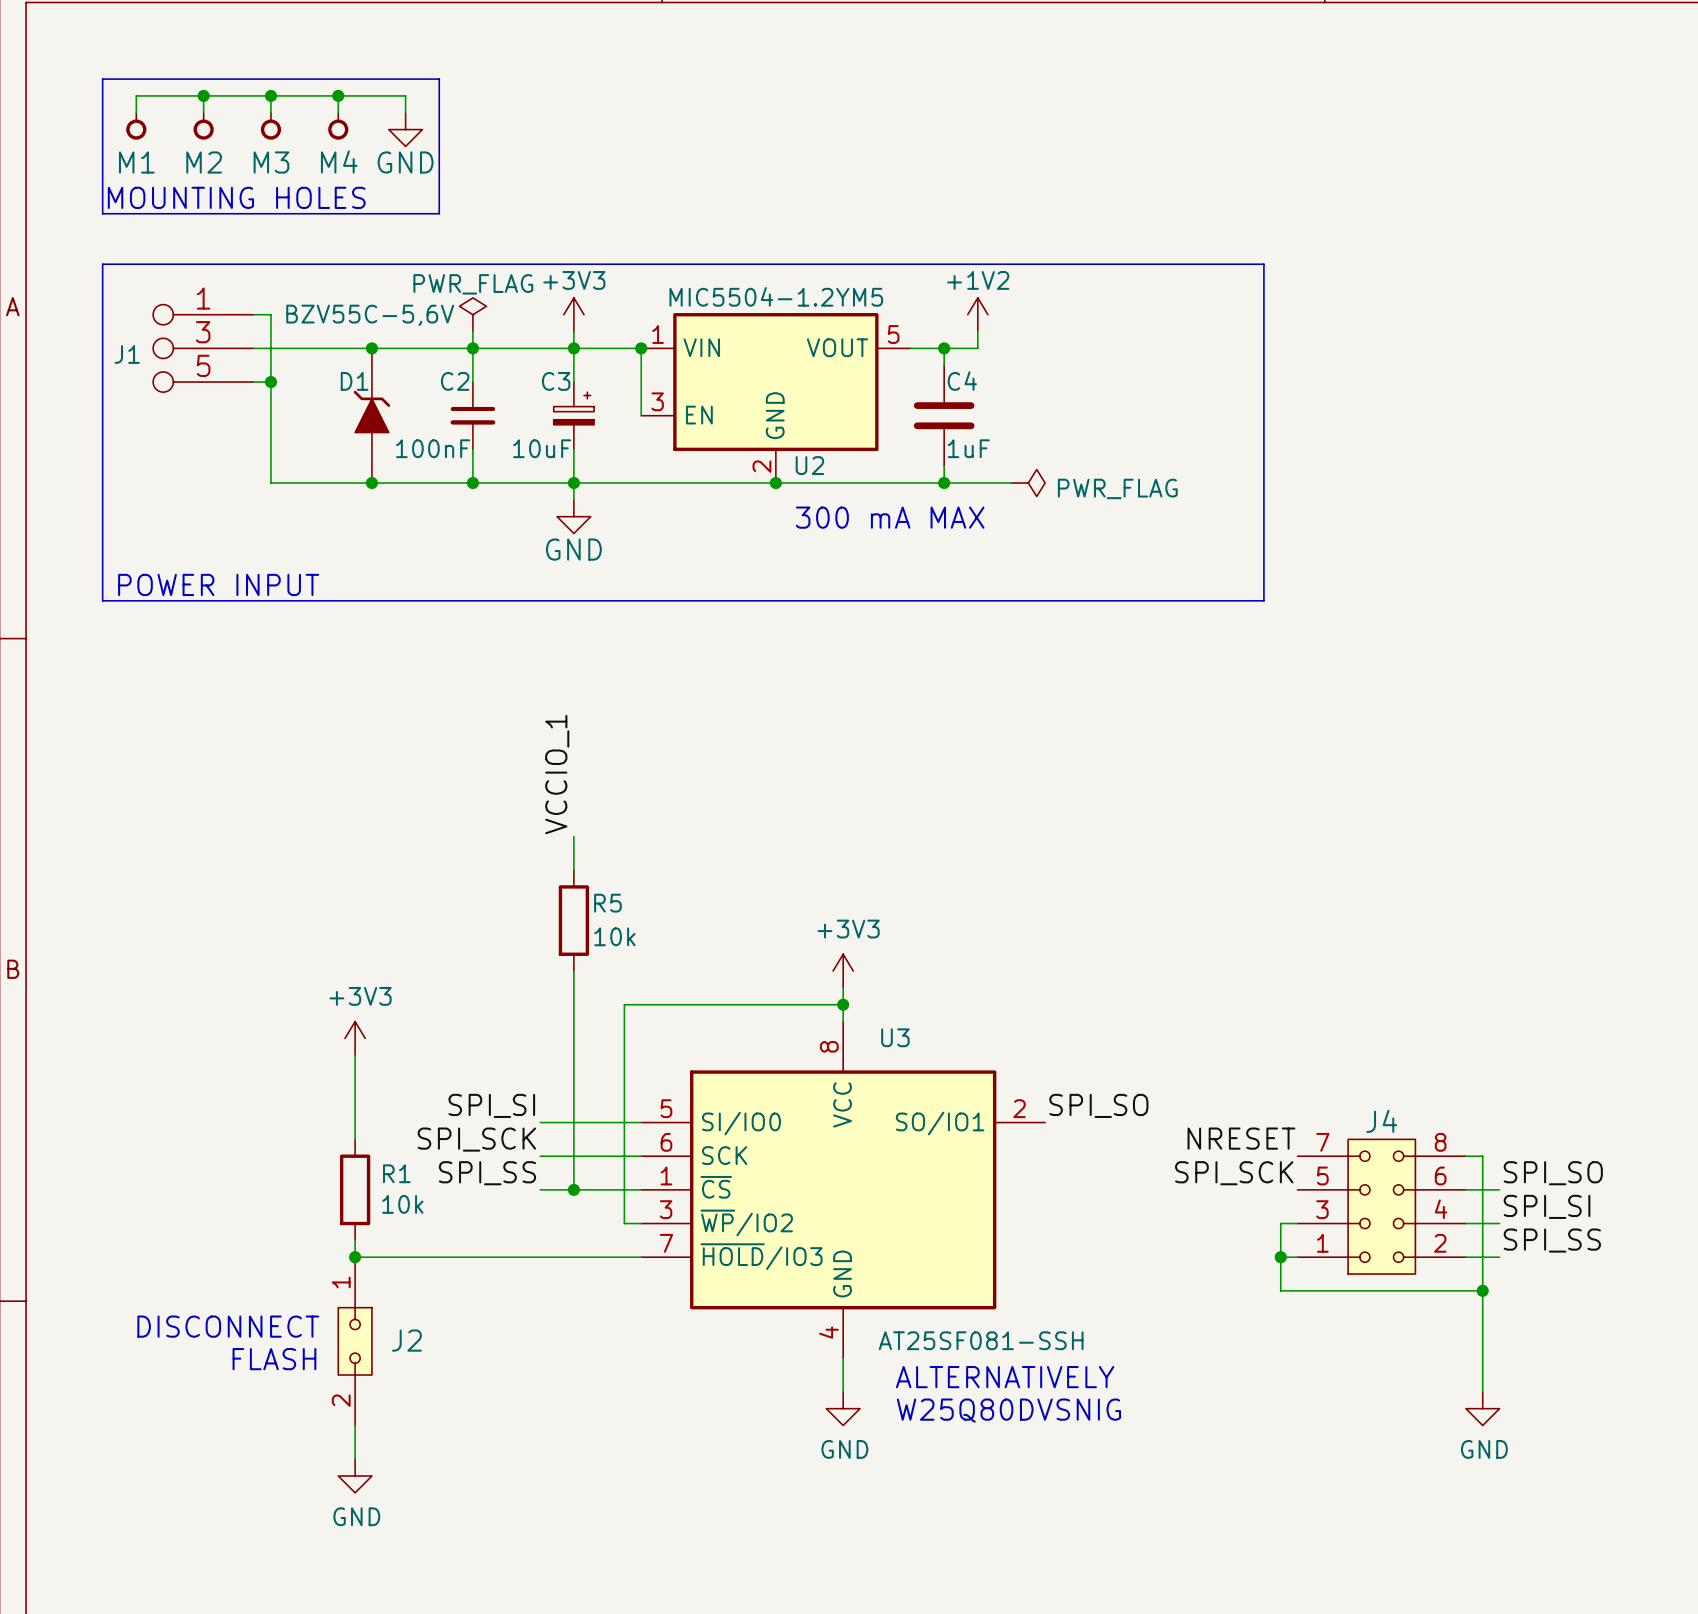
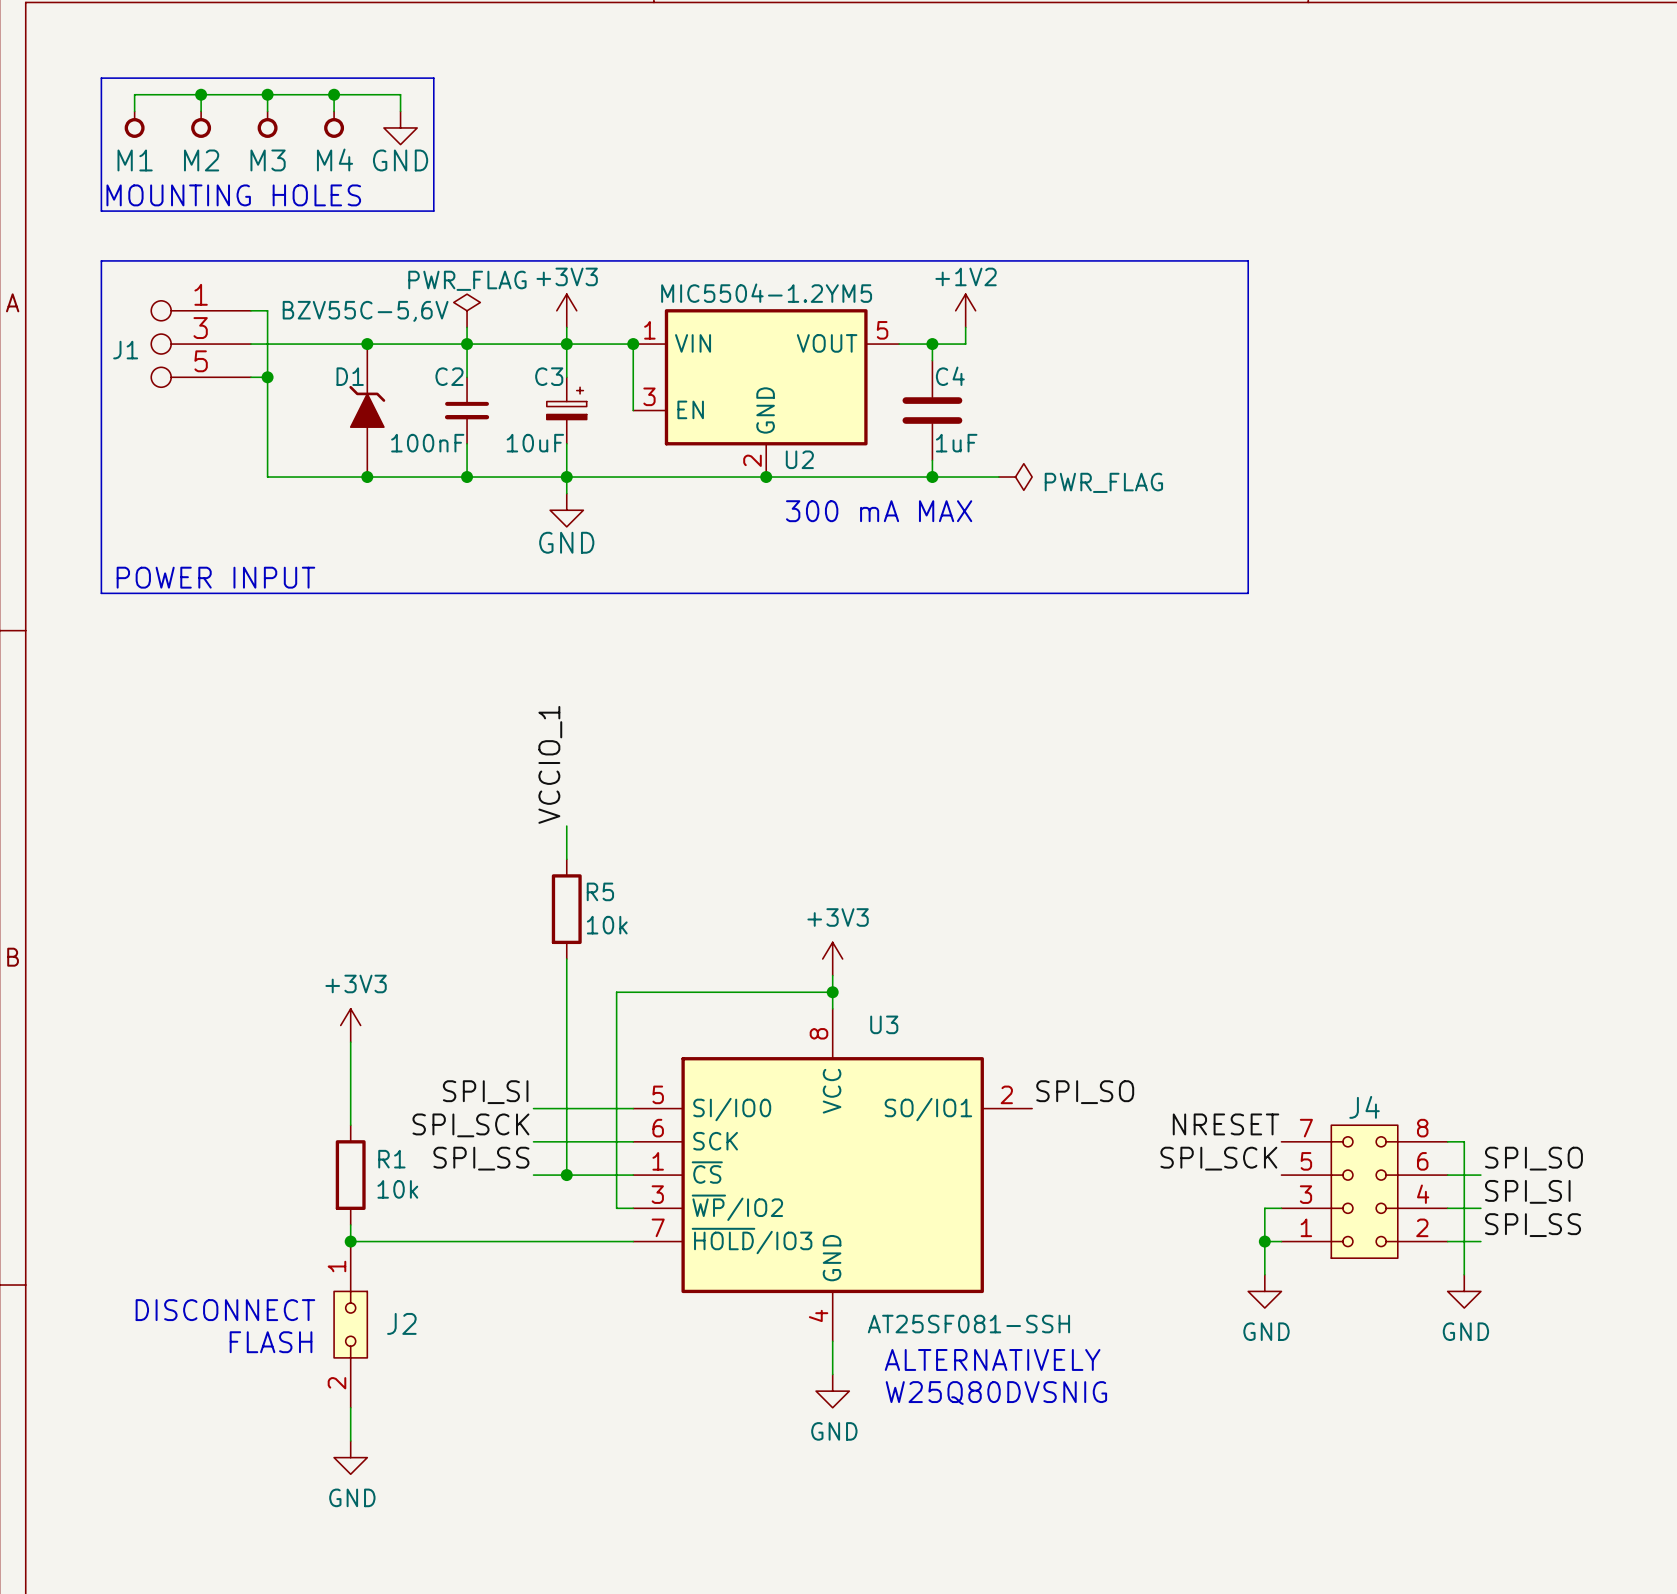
wire: (1280, 1290) (1482, 1290) (1482, 1391) -> none
junction: (1482, 1290) -> none
power symbol: none -> GND (1264, 1291)
power symbol position: GND (1482, 1408) -> GND (1464, 1291)

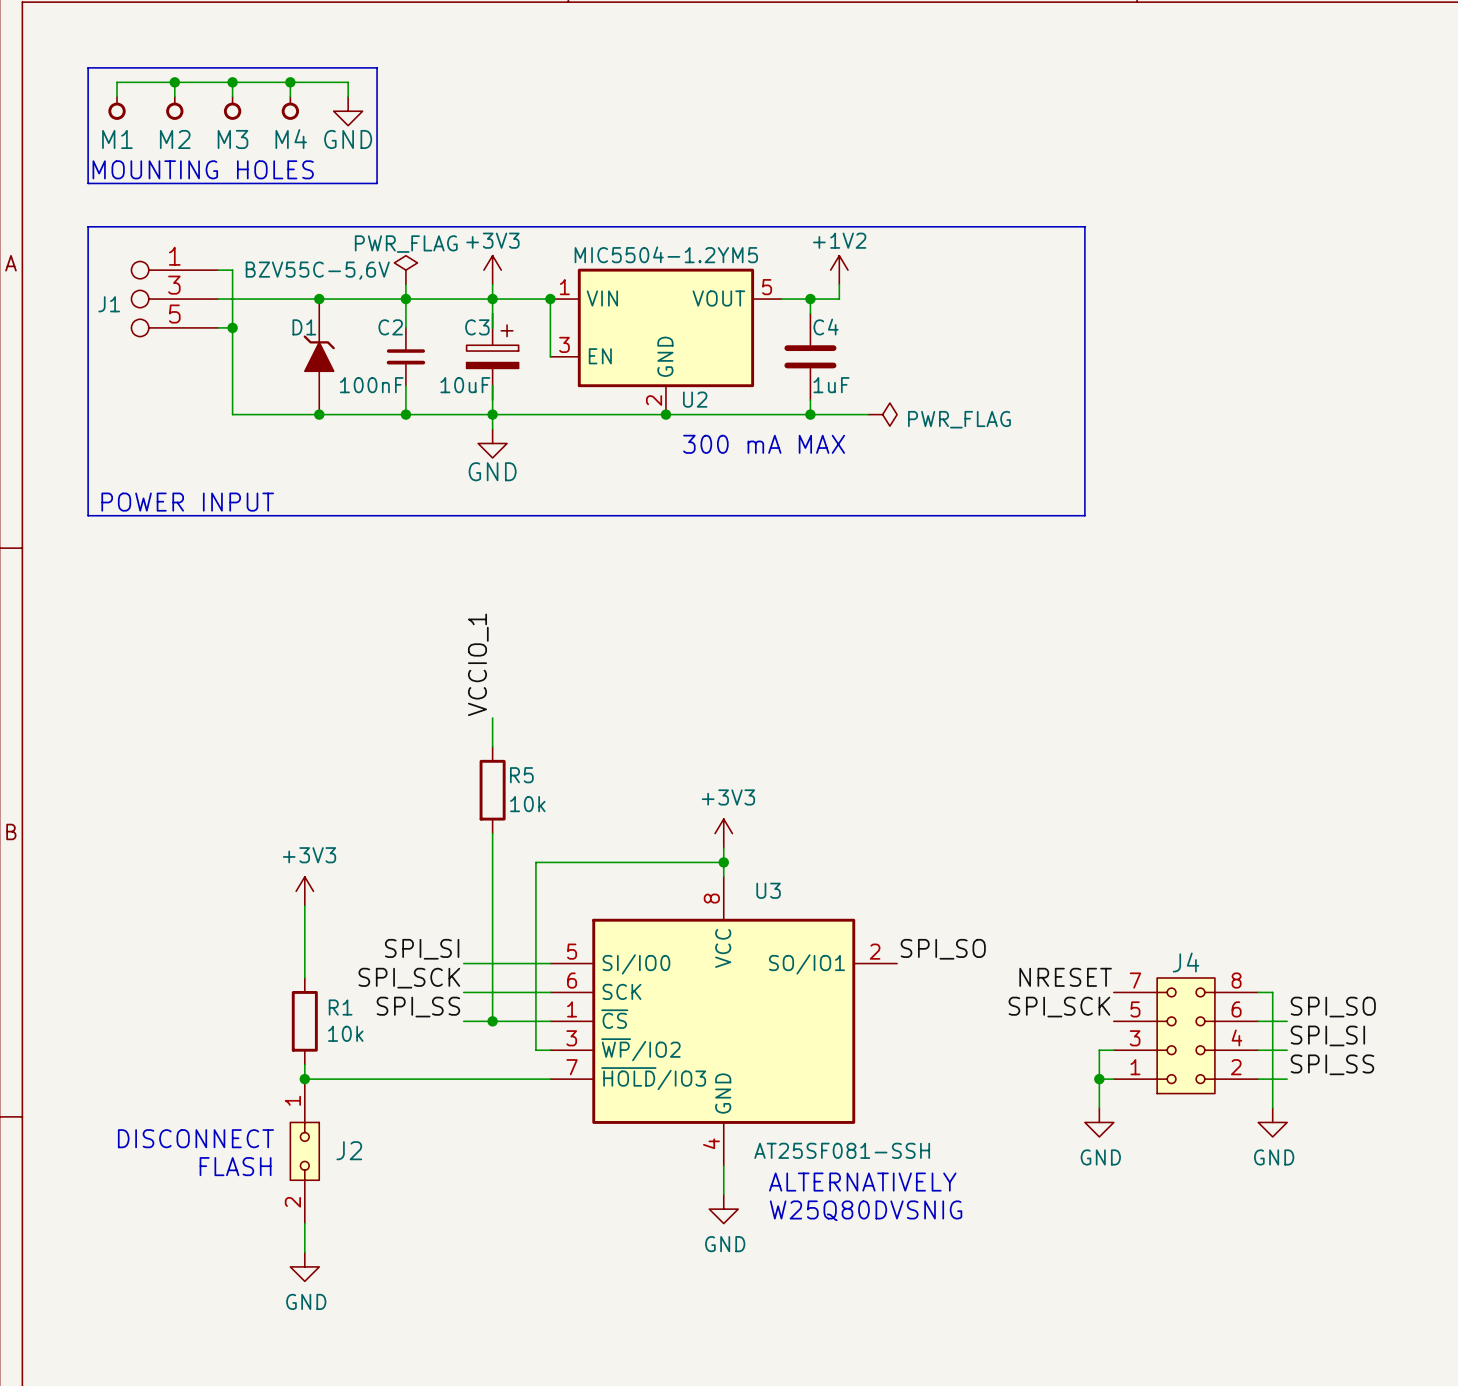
C3 symbol: [546, 377, 587, 444] -> [466, 313, 519, 401]

